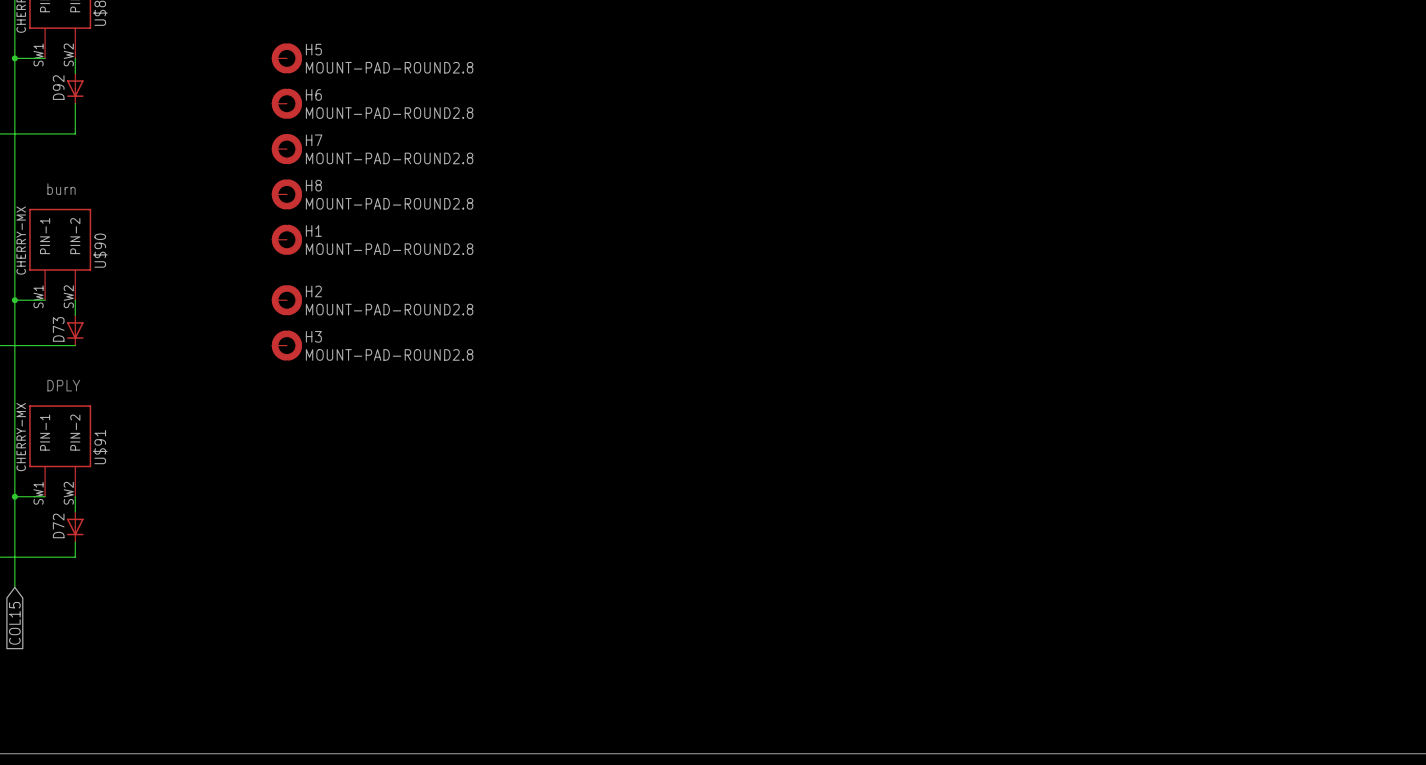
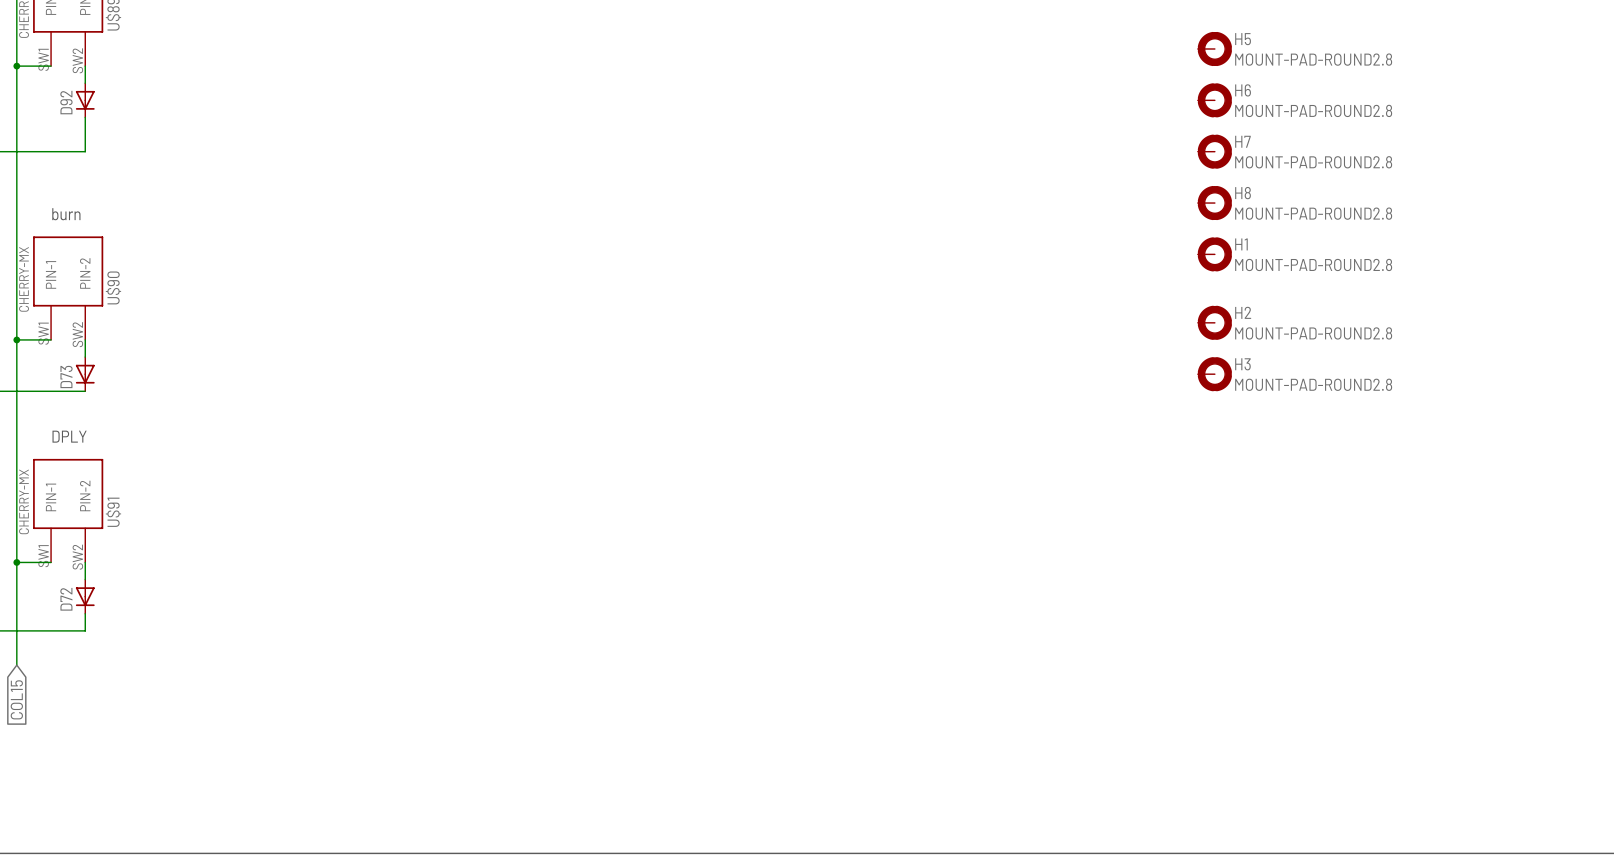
H5 position: (286, 58) -> (1214, 48)
H6 position: (286, 103) -> (1214, 100)
H7 position: (286, 149) -> (1214, 151)
H8 position: (286, 194) -> (1214, 203)
H1 position: (286, 239) -> (1214, 254)
H2 position: (286, 300) -> (1214, 322)
H3 position: (286, 345) -> (1214, 374)

